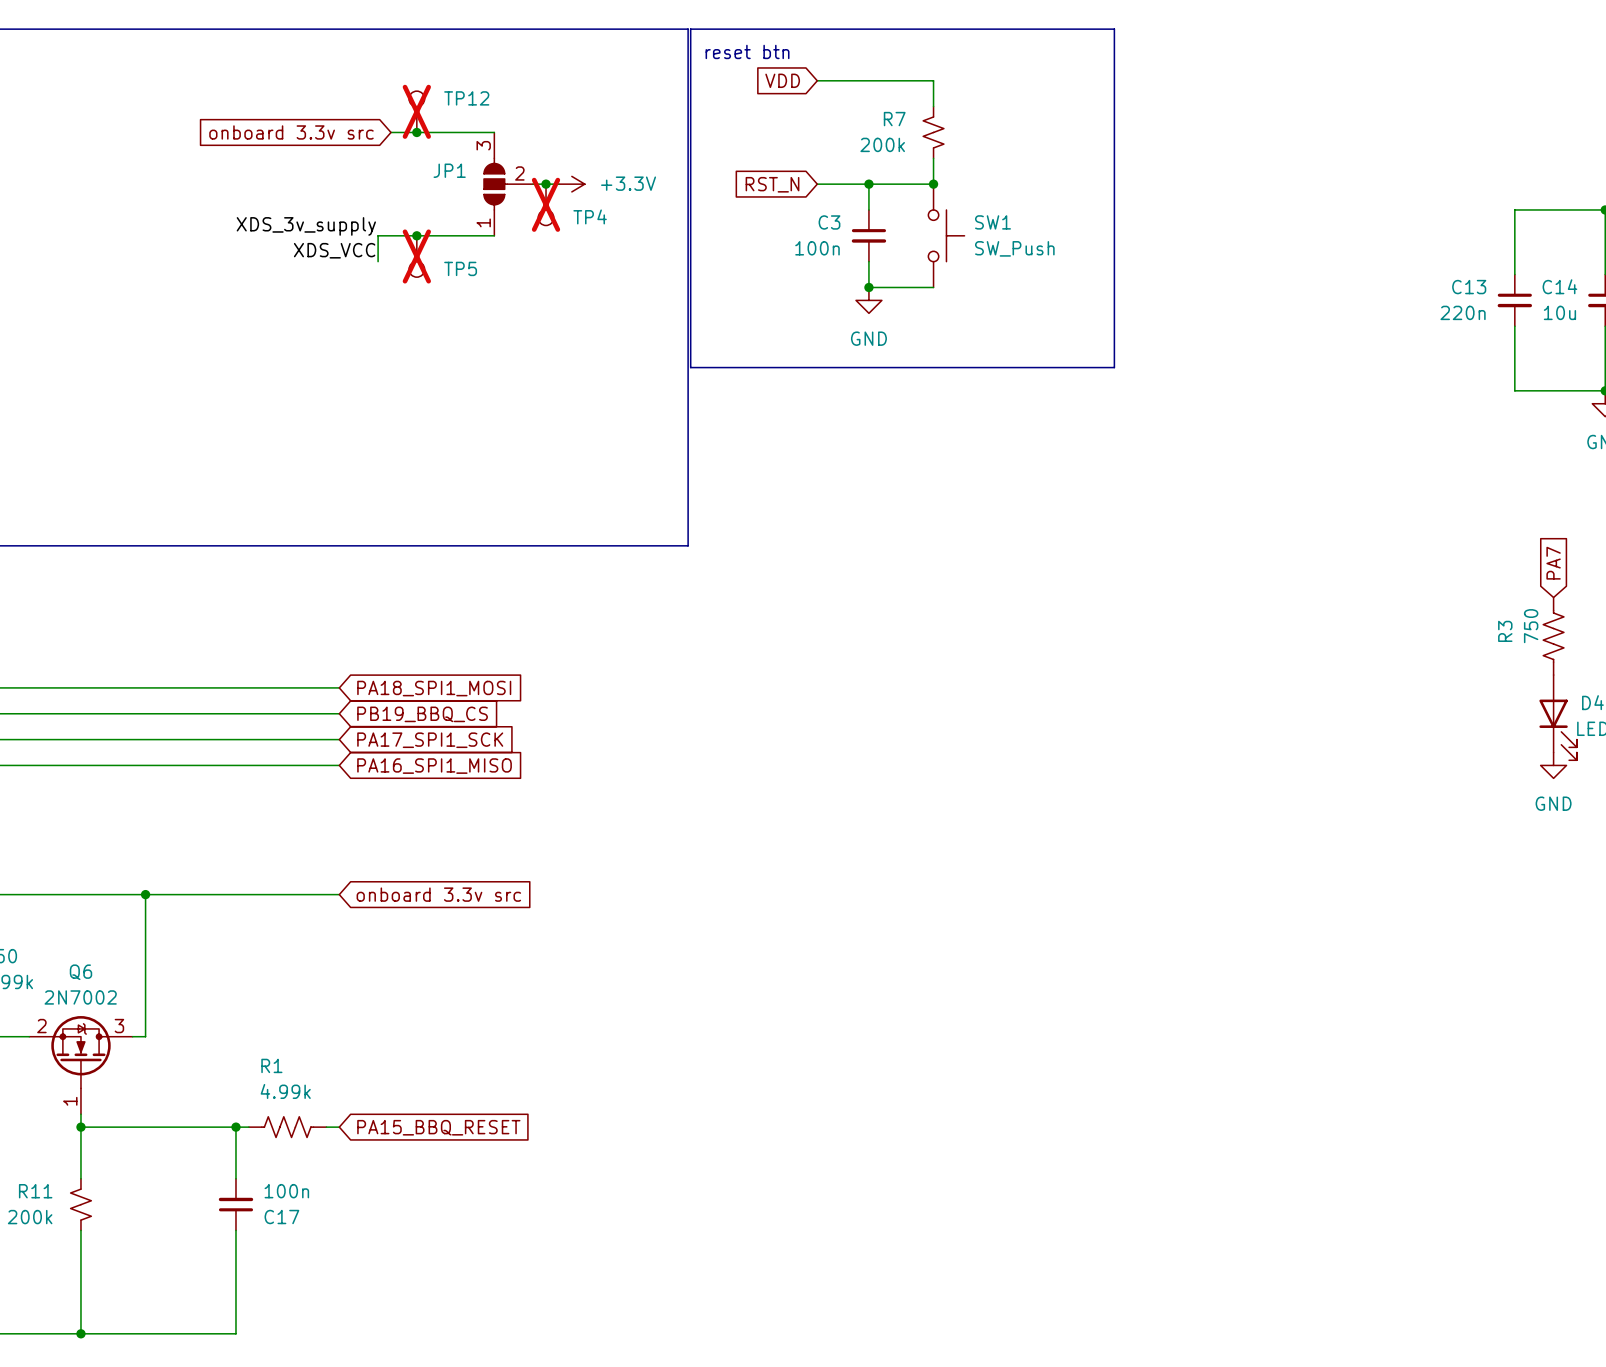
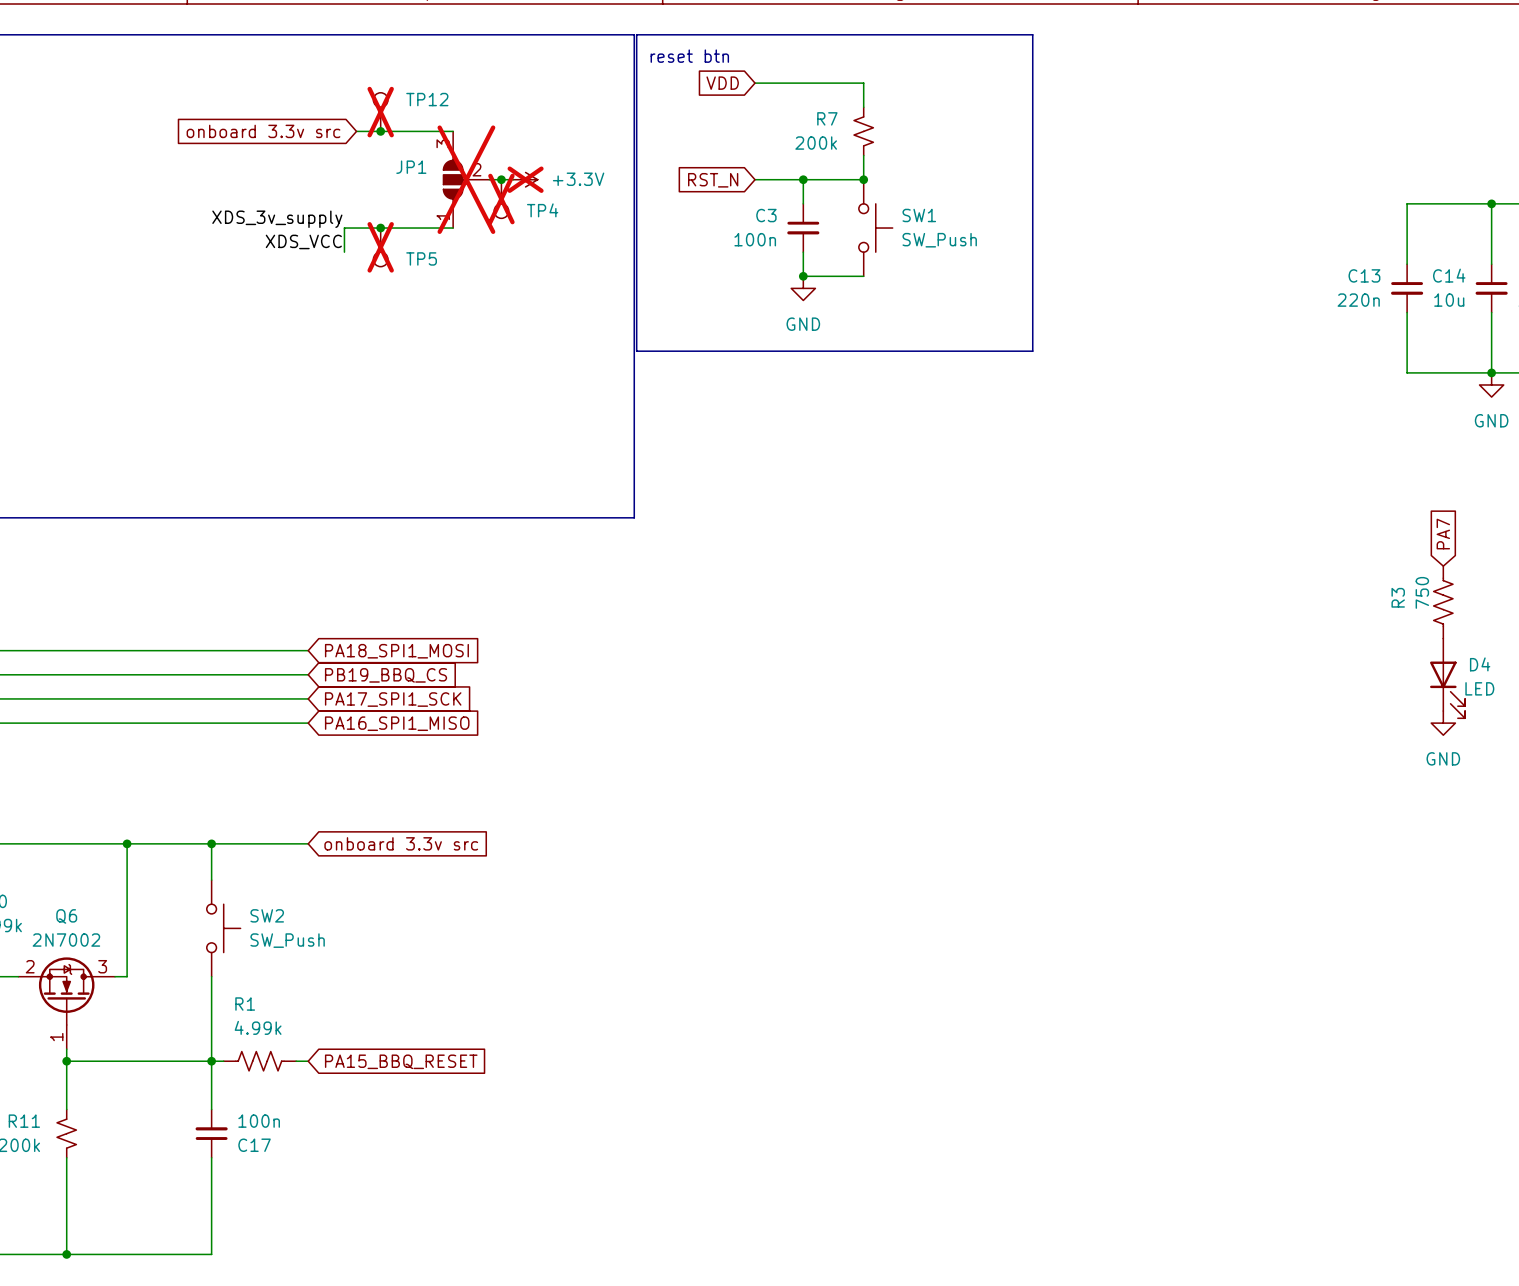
JP1 do-not-place cross: none -> (466, 179)
power symbol do-not-place cross: none -> (525, 179)
wire: none -> (211, 843) (211, 880)
junction: none -> (211, 843)
SW2: none -> SW_Push (223, 928)
wire: none -> (211, 976) (211, 1061)

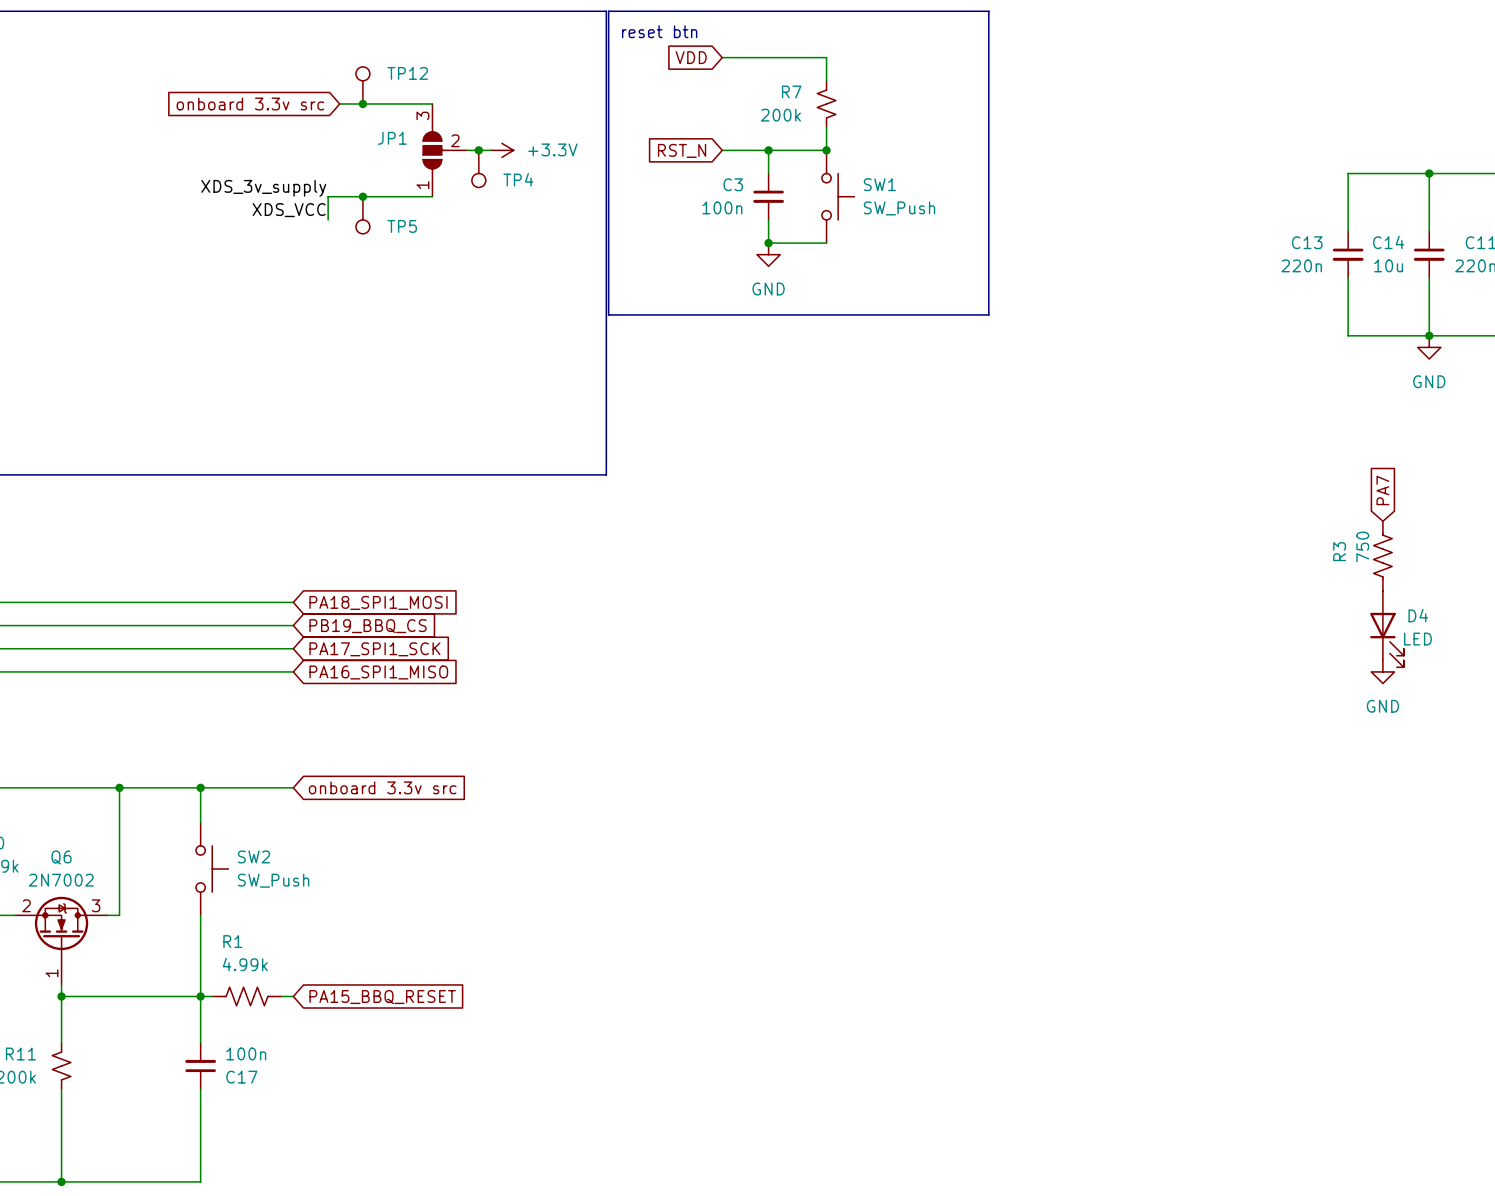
TP12 do-not-place cross: (380, 112) -> none
JP1 do-not-place cross: (466, 179) -> none
power symbol do-not-place cross: (525, 179) -> none
TP4 do-not-place cross: (501, 199) -> none
TP5 do-not-place cross: (380, 247) -> none

